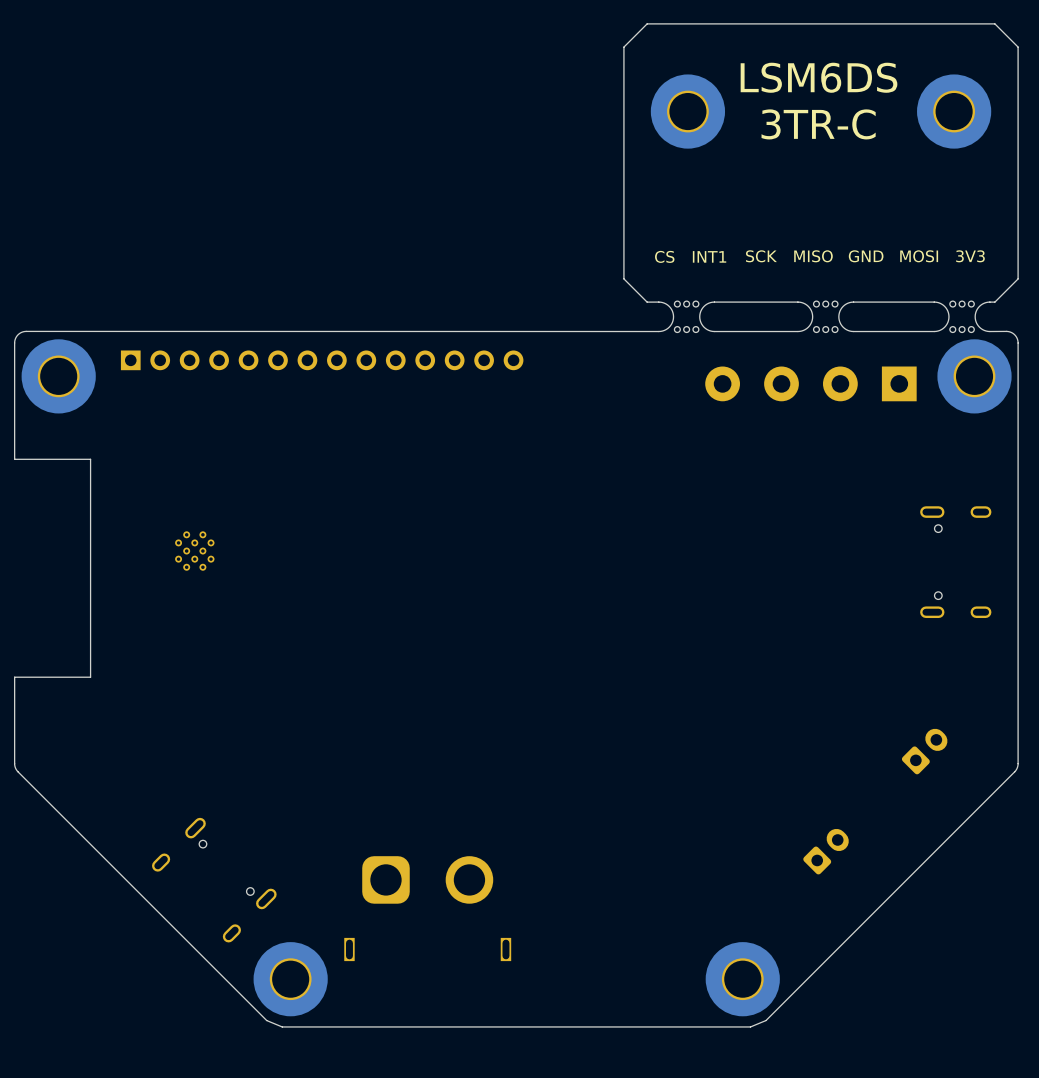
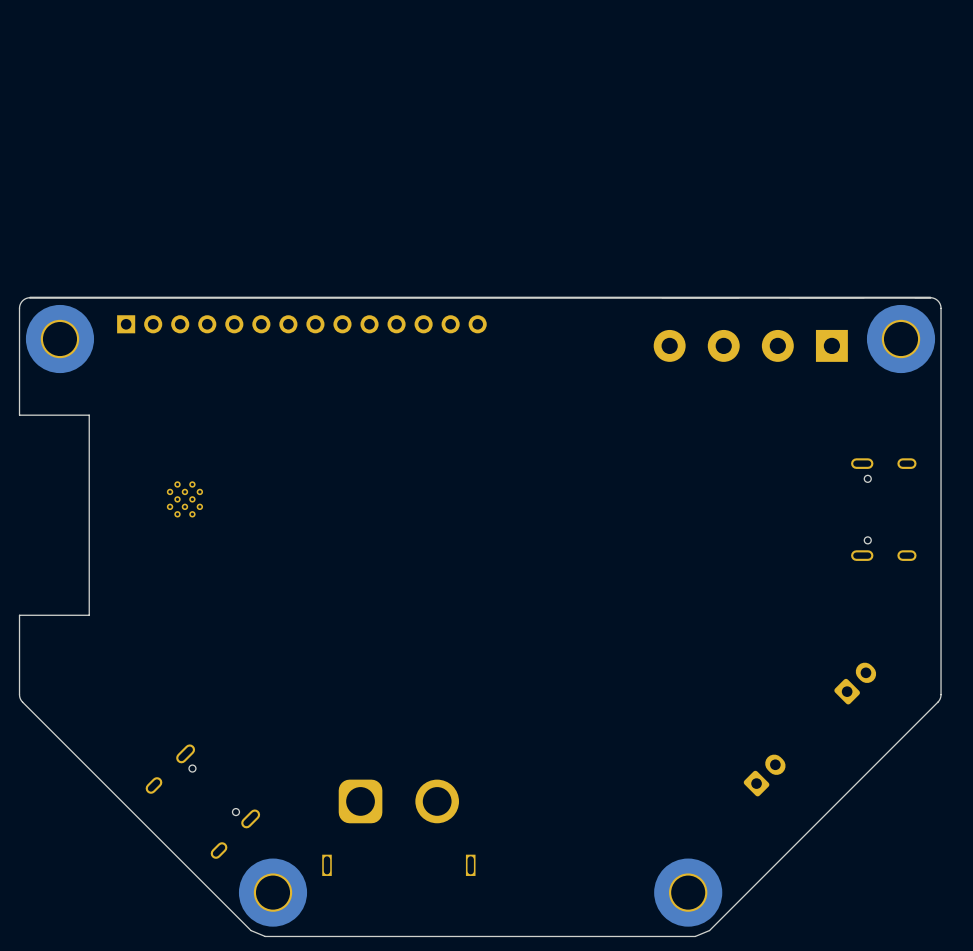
text: LSM6DS (819, 77) -> none
part: (687, 111) -> none
part: (954, 111) -> none
text: 3TR-C (818, 124) -> none
text: CS (664, 256) -> none
text: INT1 (709, 256) -> none
text: SCK (761, 256) -> none
text: MISO (813, 256) -> none
text: GND (866, 256) -> none
text: MOSI (919, 256) -> none
text: 3V3 (970, 256) -> none
board edge: (797, 302) (714, 302) -> none
board edge: (934, 302) (853, 302) -> none
board edge: (989, 302) (994, 302) (1018, 278) (1018, 47) (994, 23) (647, 23) (623, 47) (623, 278) (647, 302) (658, 302) -> none
part: (686, 316) -> none
part: (825, 316) -> none
part: (962, 316) -> none
board edge: (26, 331) (658, 331) -> (30, 297) (930, 297)

